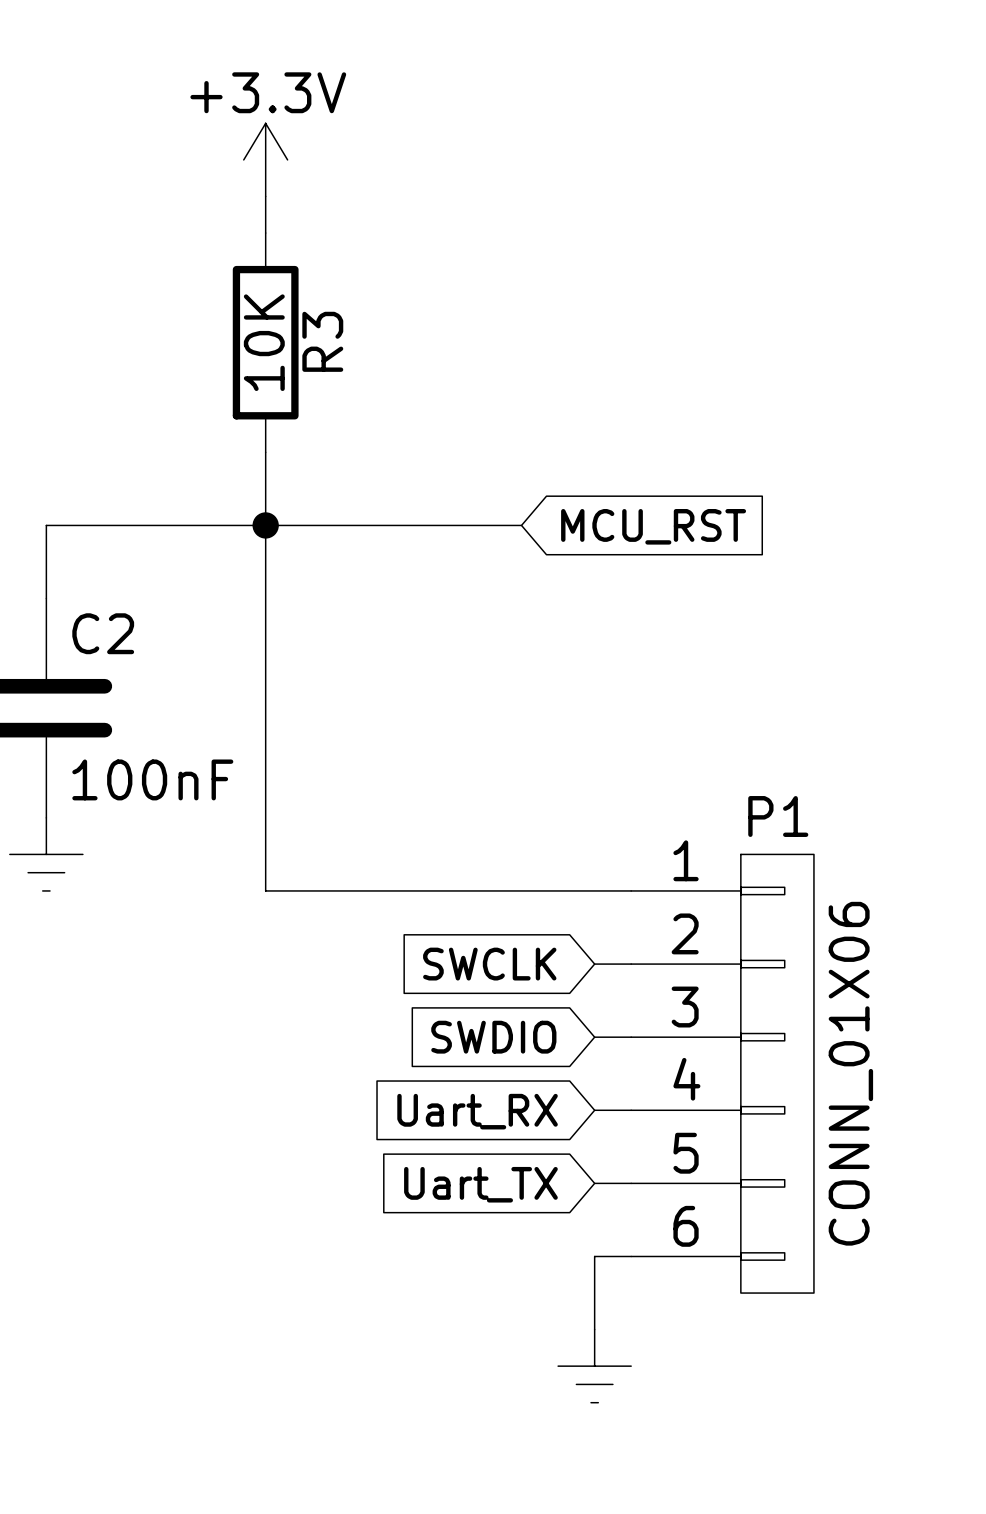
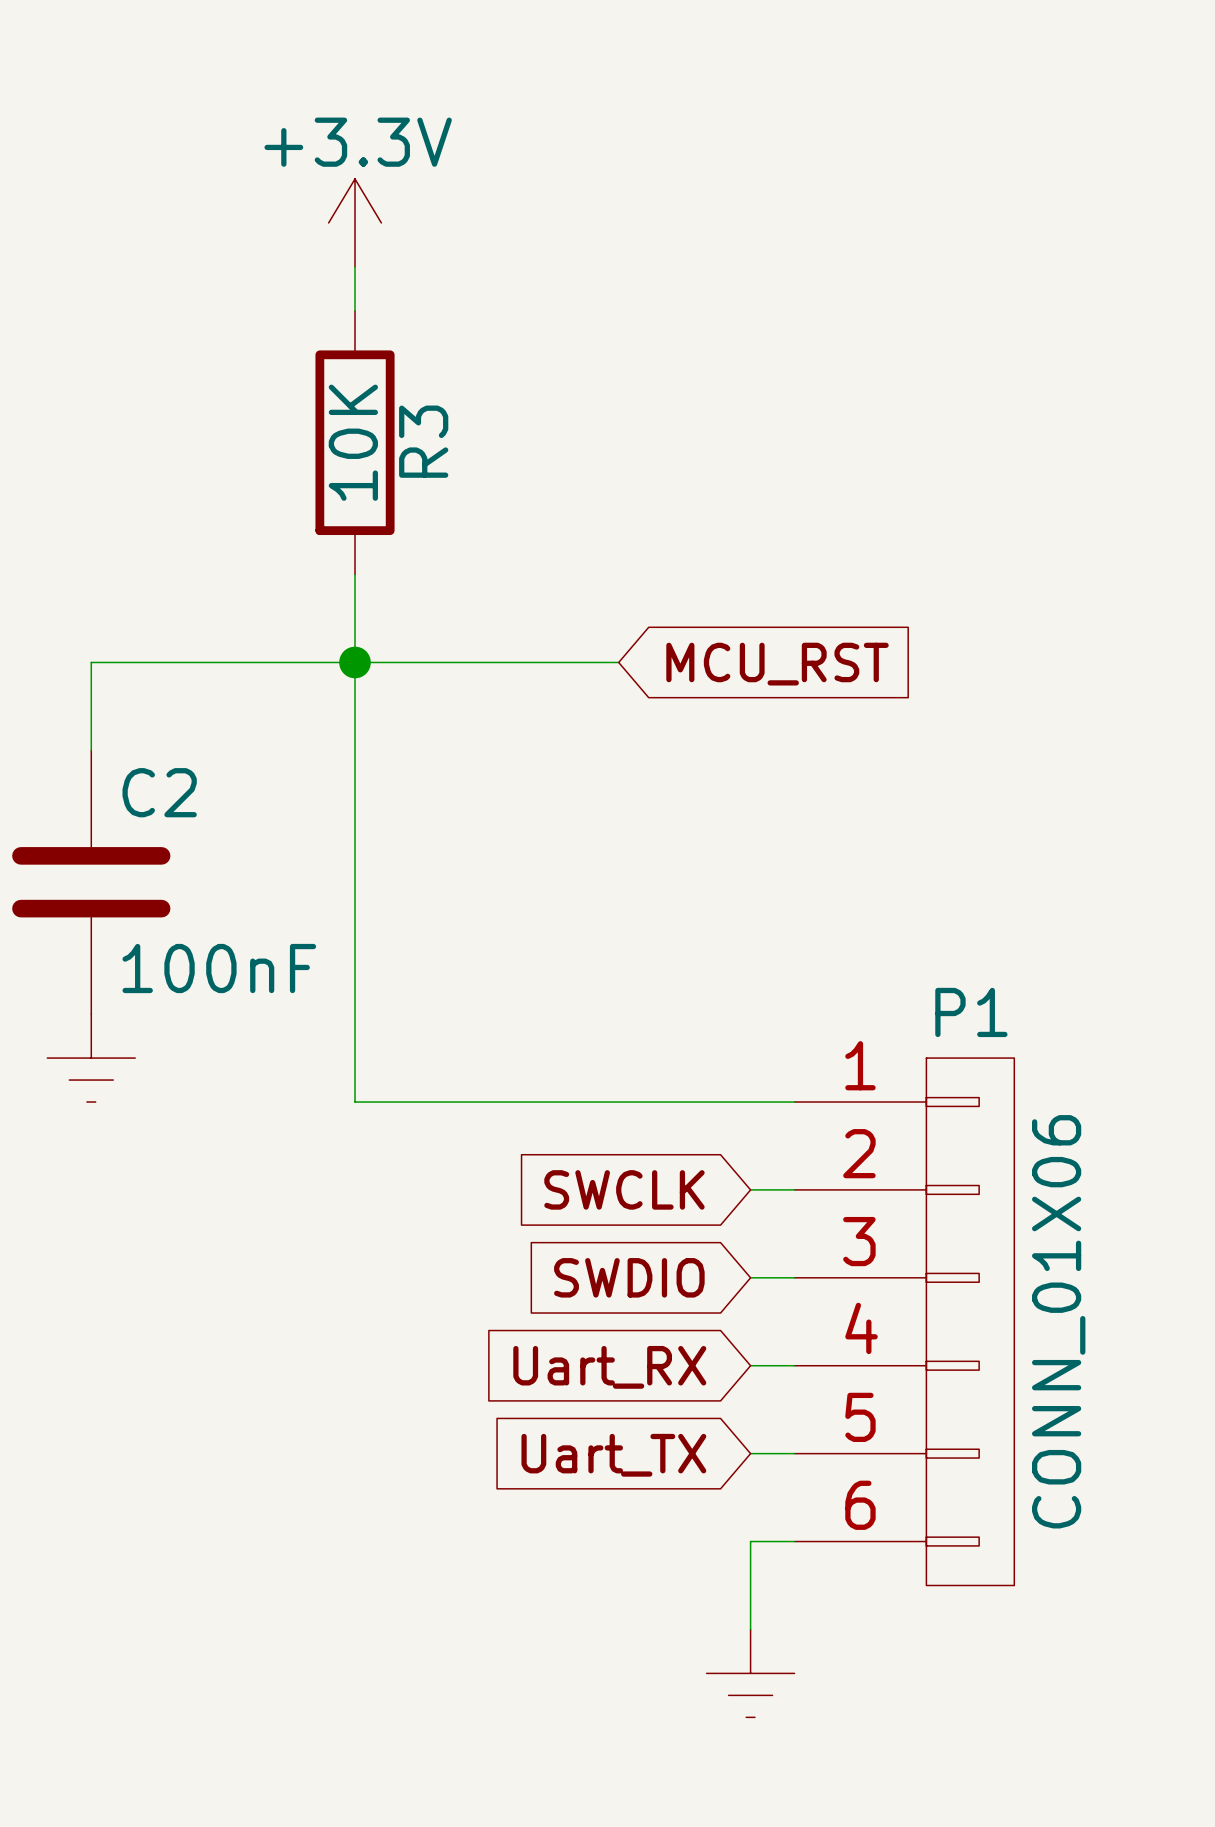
wire: (484, 525) (521, 525) -> none
global label position: MCU_RST (653, 526) -> MCU_RST (777, 664)

